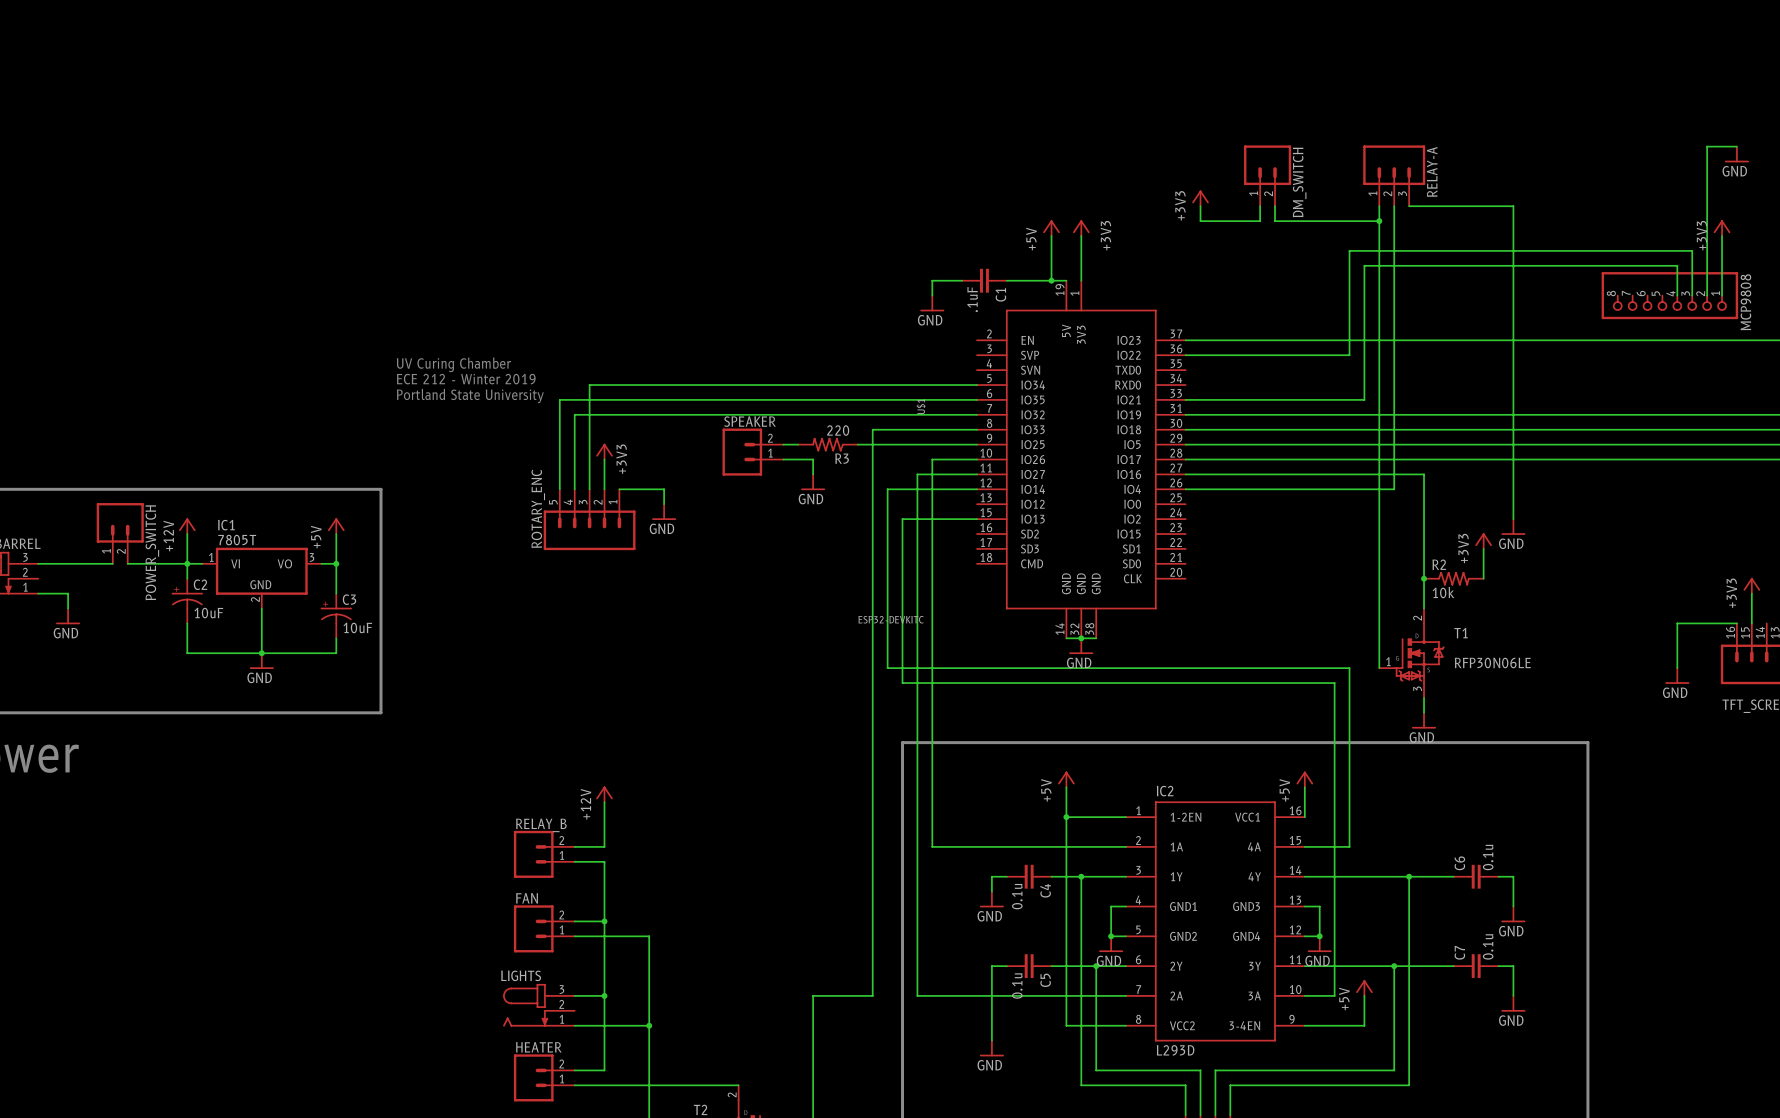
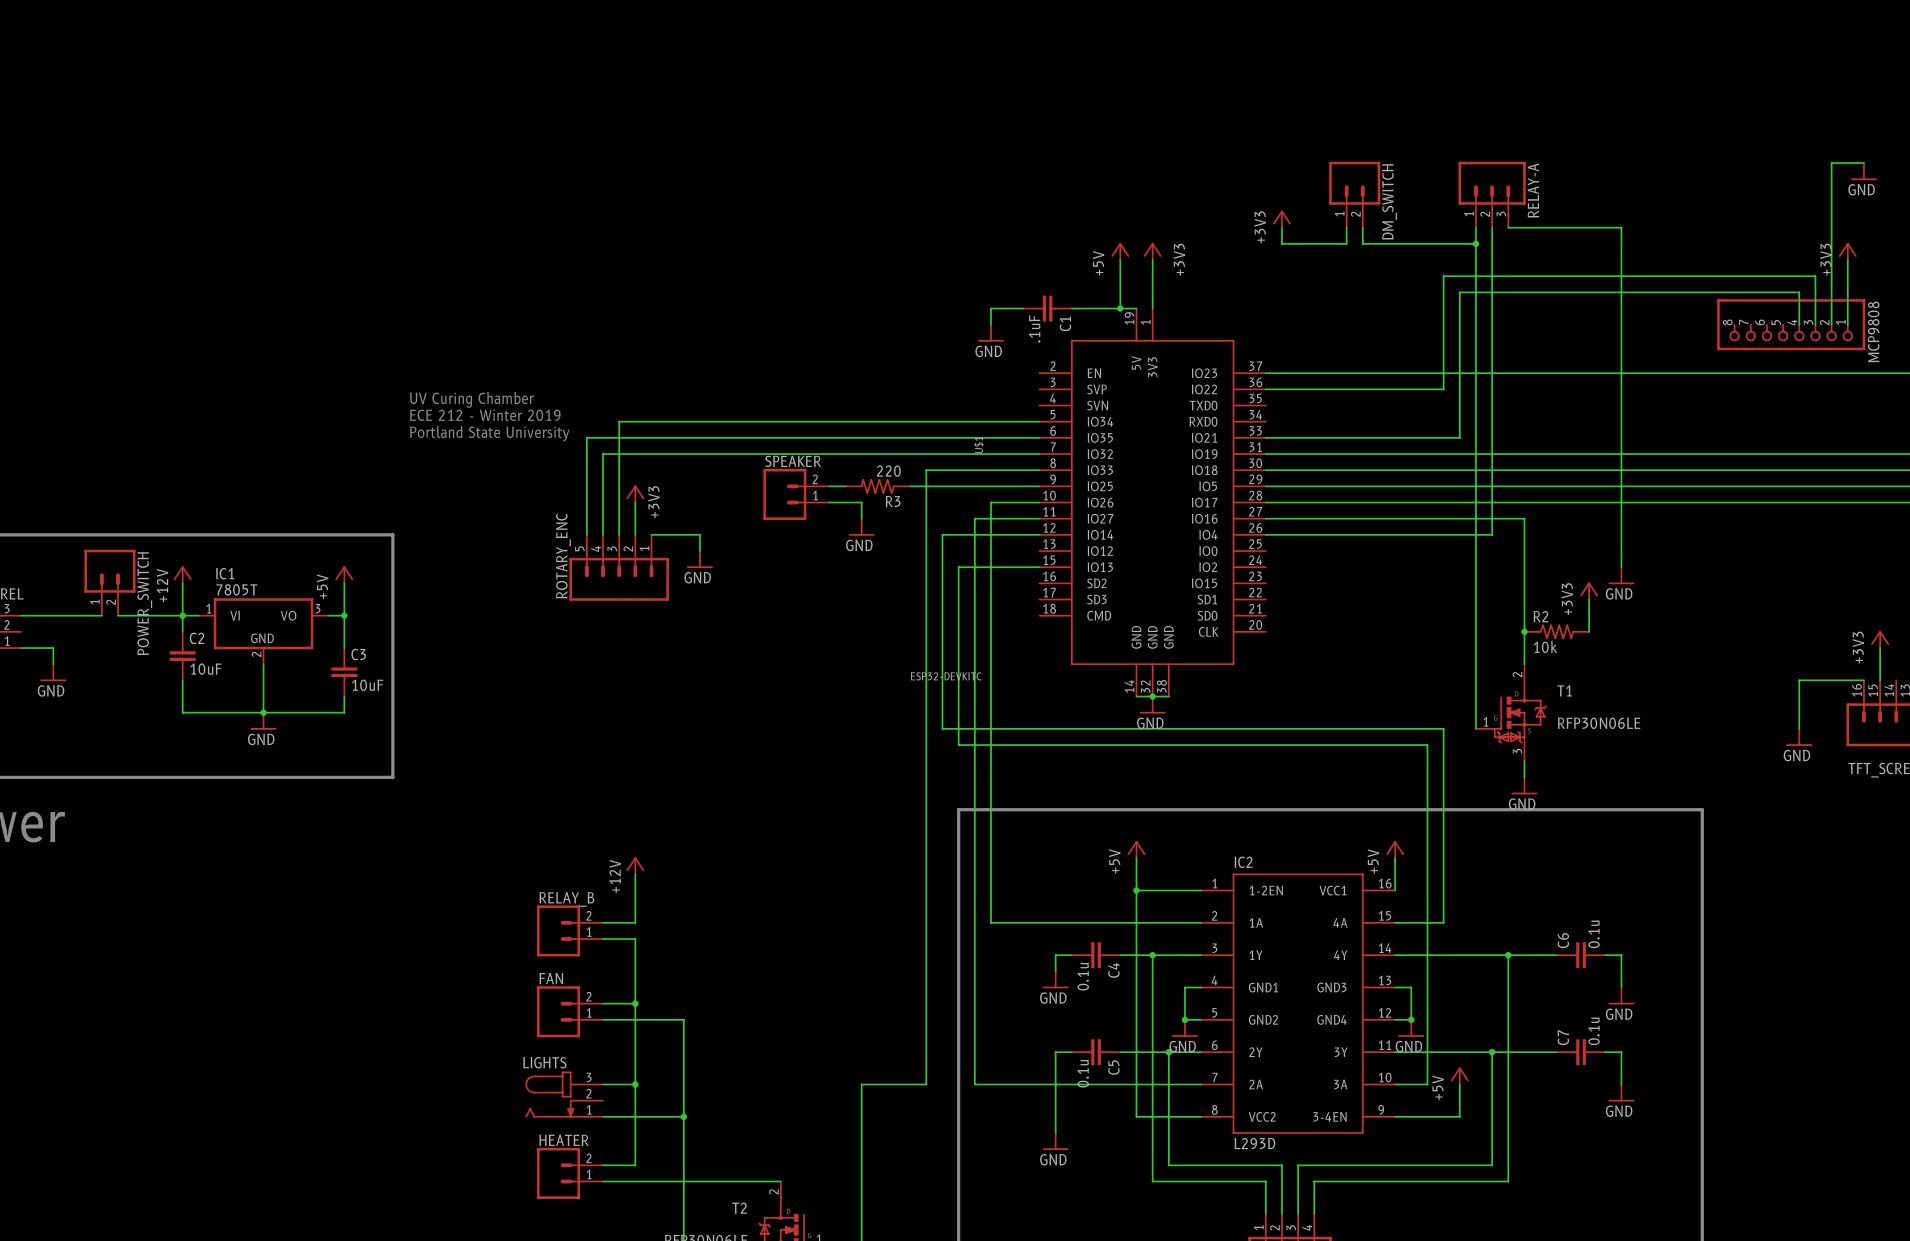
C2 symbol: [171, 578, 203, 624] -> [169, 631, 196, 681]
C3 symbol: [320, 593, 352, 639] -> [331, 648, 358, 697]

